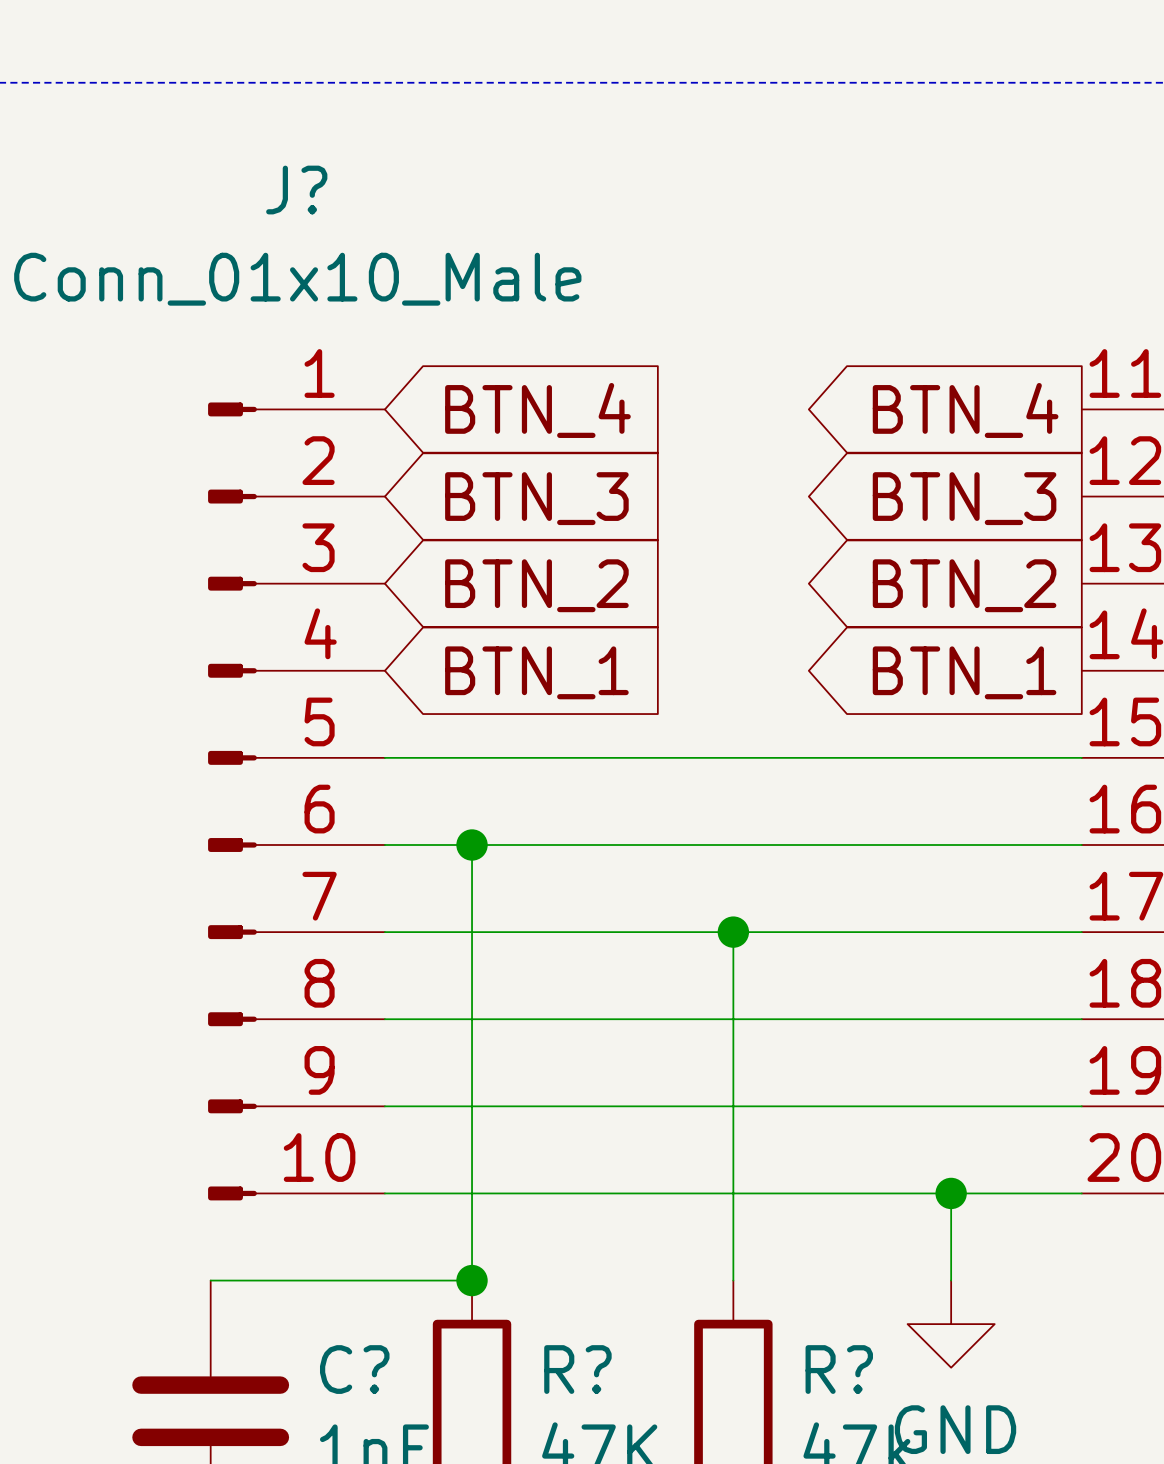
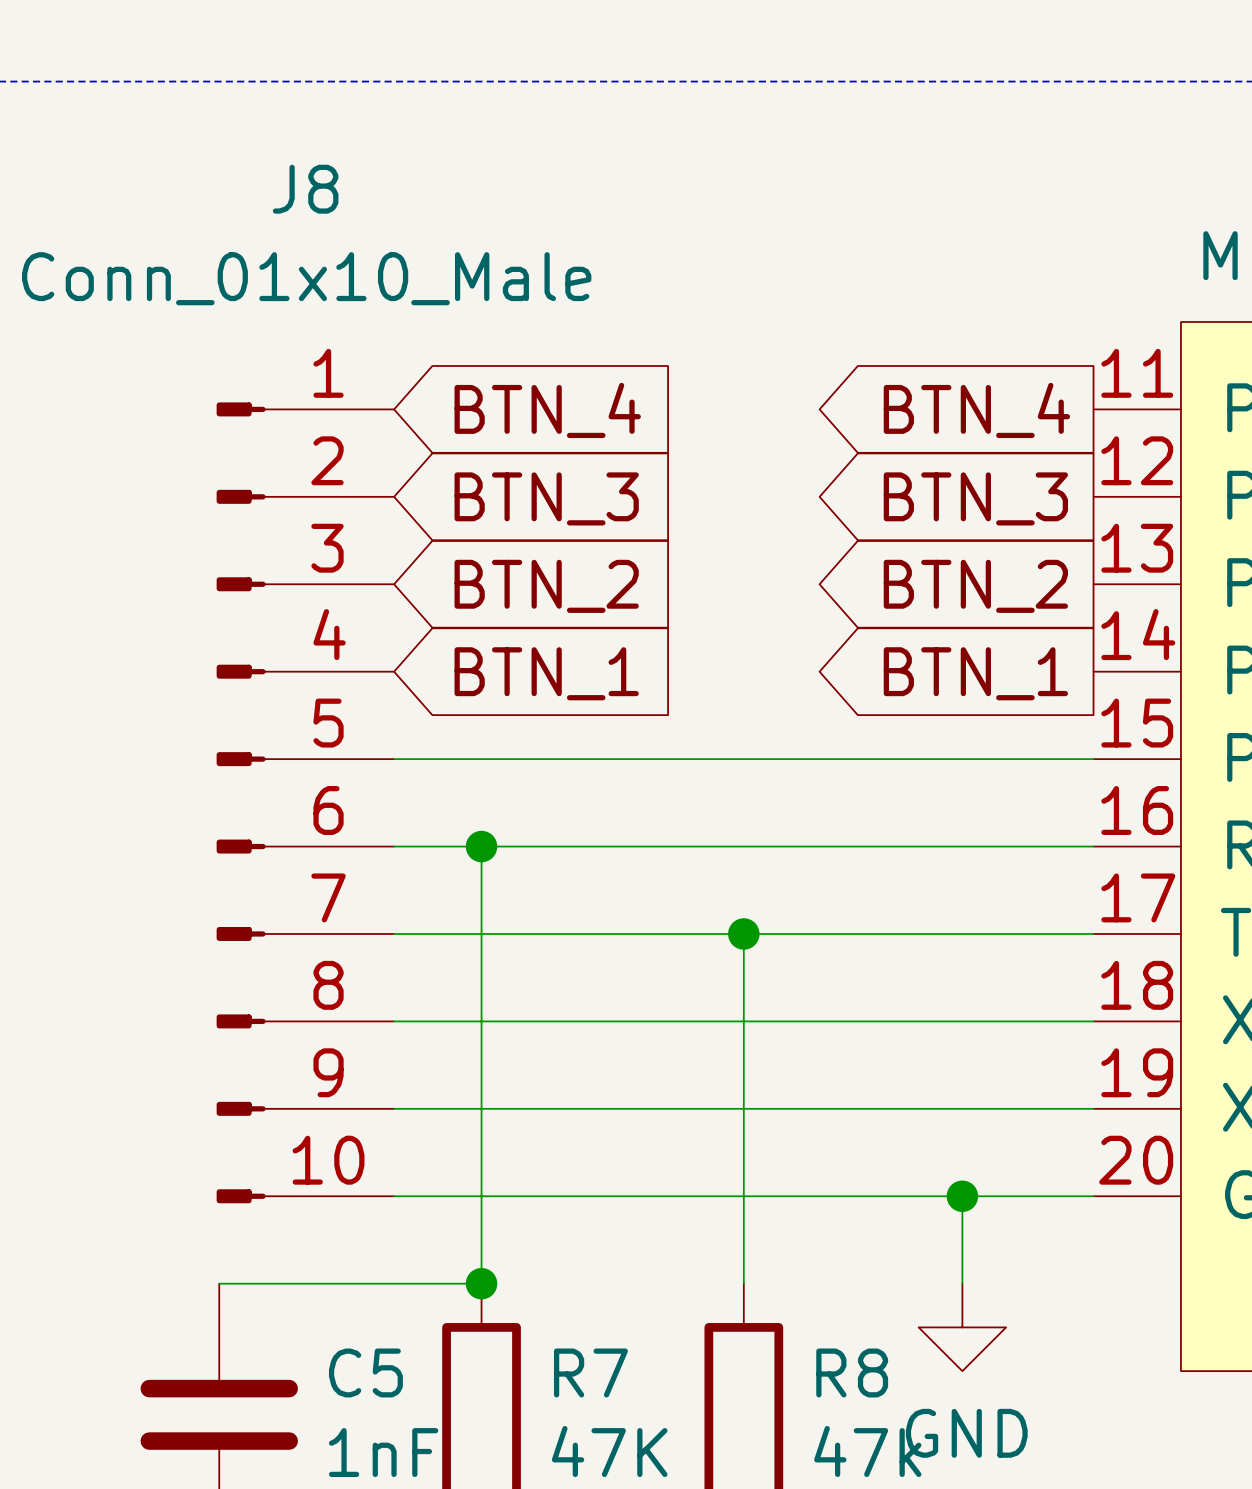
J? name: J? (296, 190) -> J8 (305, 189)
C? name: C? (354, 1369) -> C5 (365, 1372)
R? name: R? (577, 1369) -> R7 (590, 1372)
R? name: R? (839, 1369) -> R8 (852, 1372)

